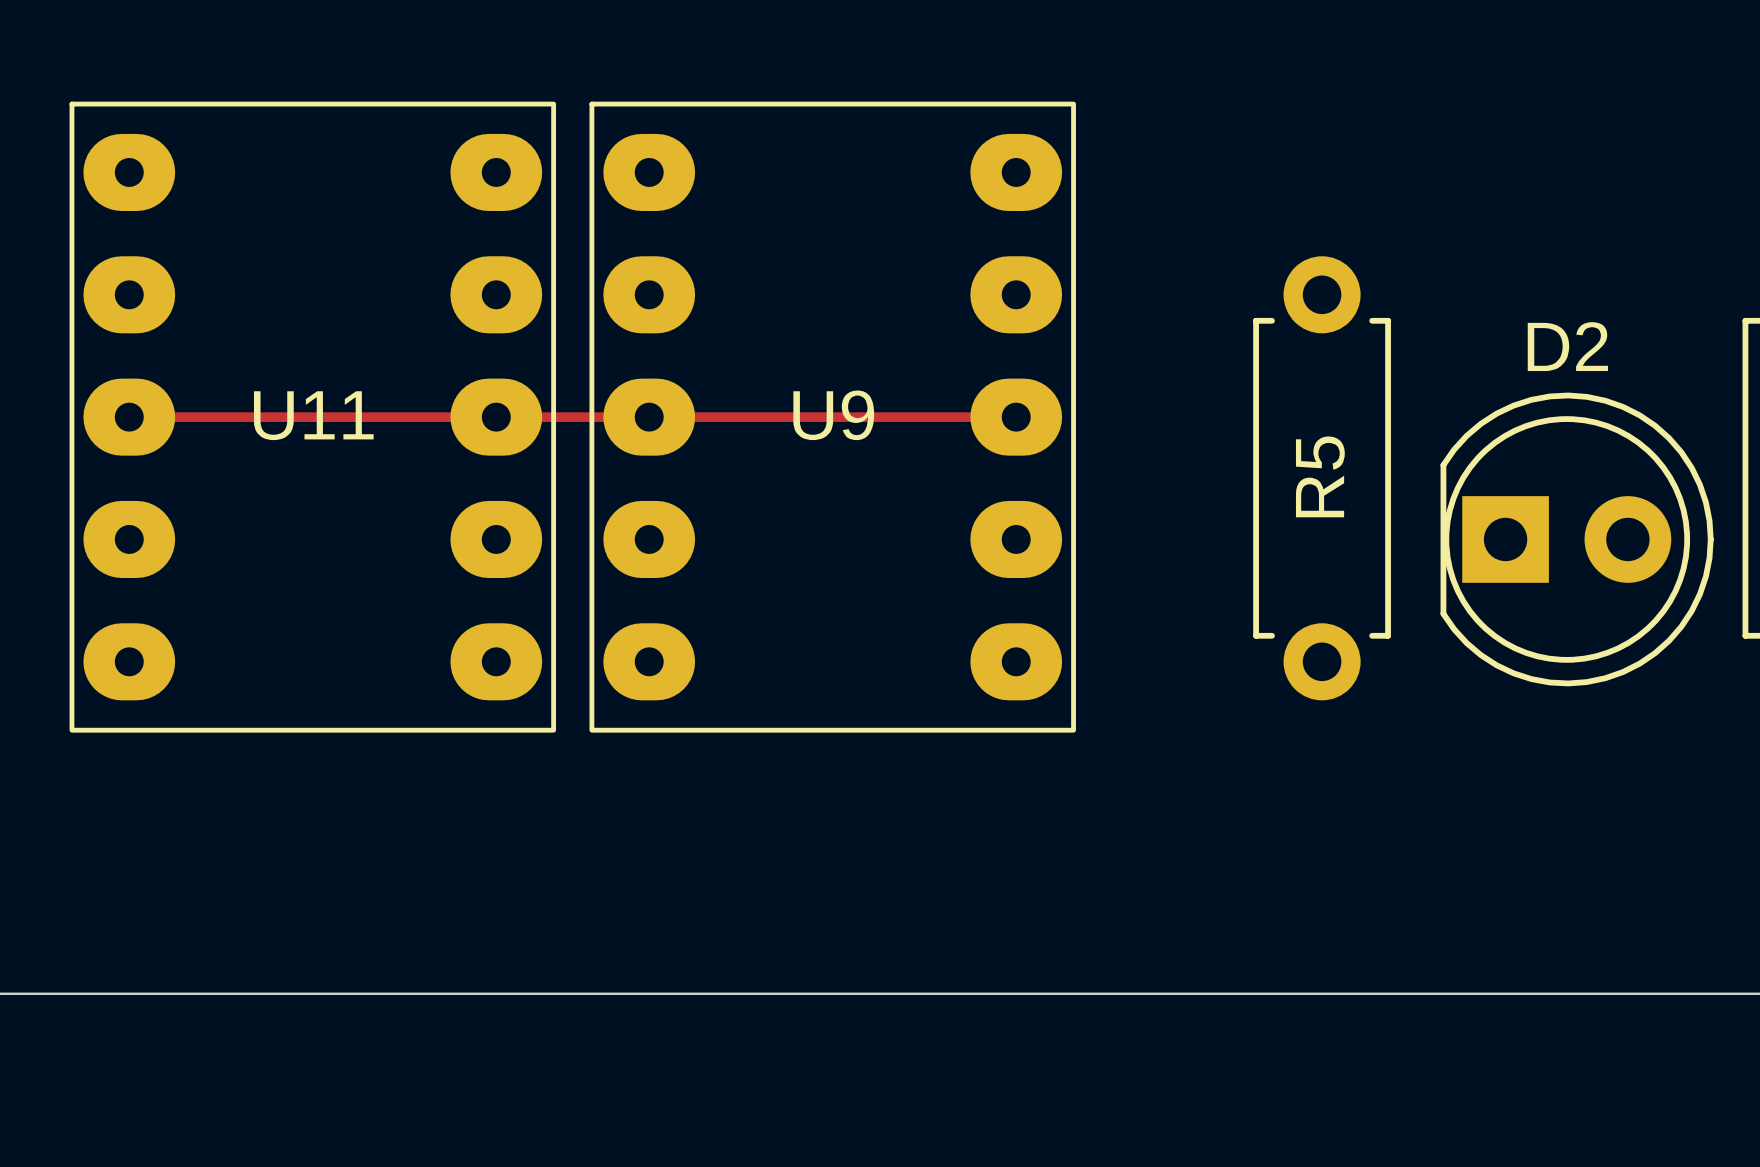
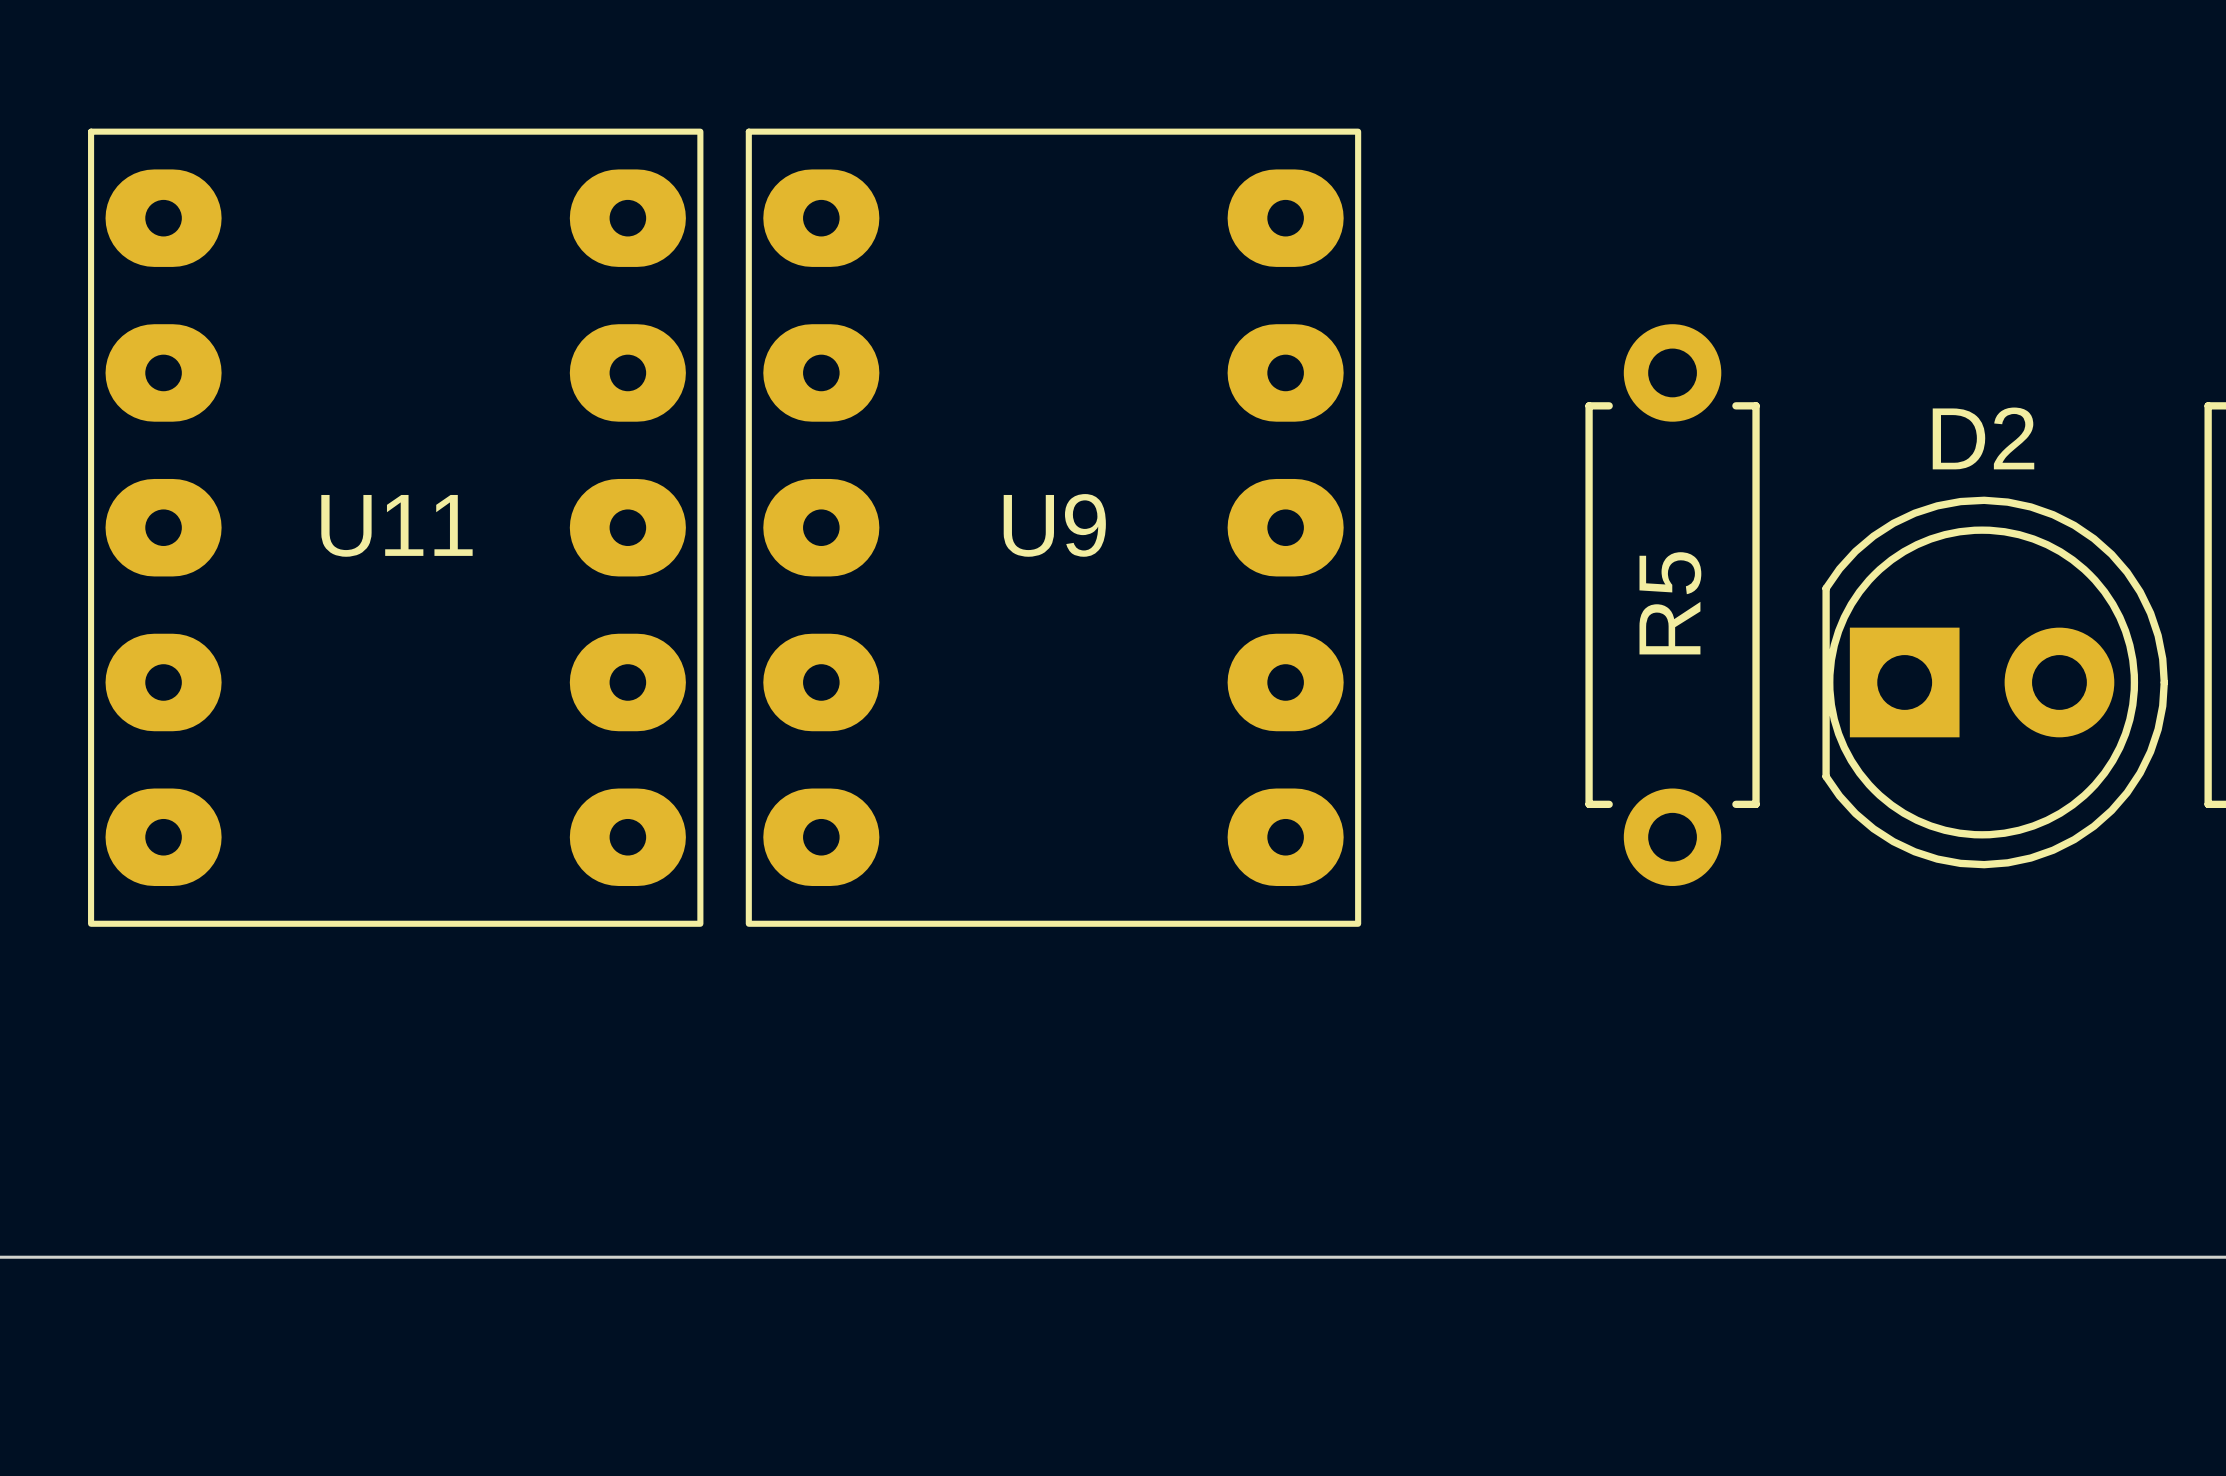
track: (129, 417) (1016, 417) -> none

